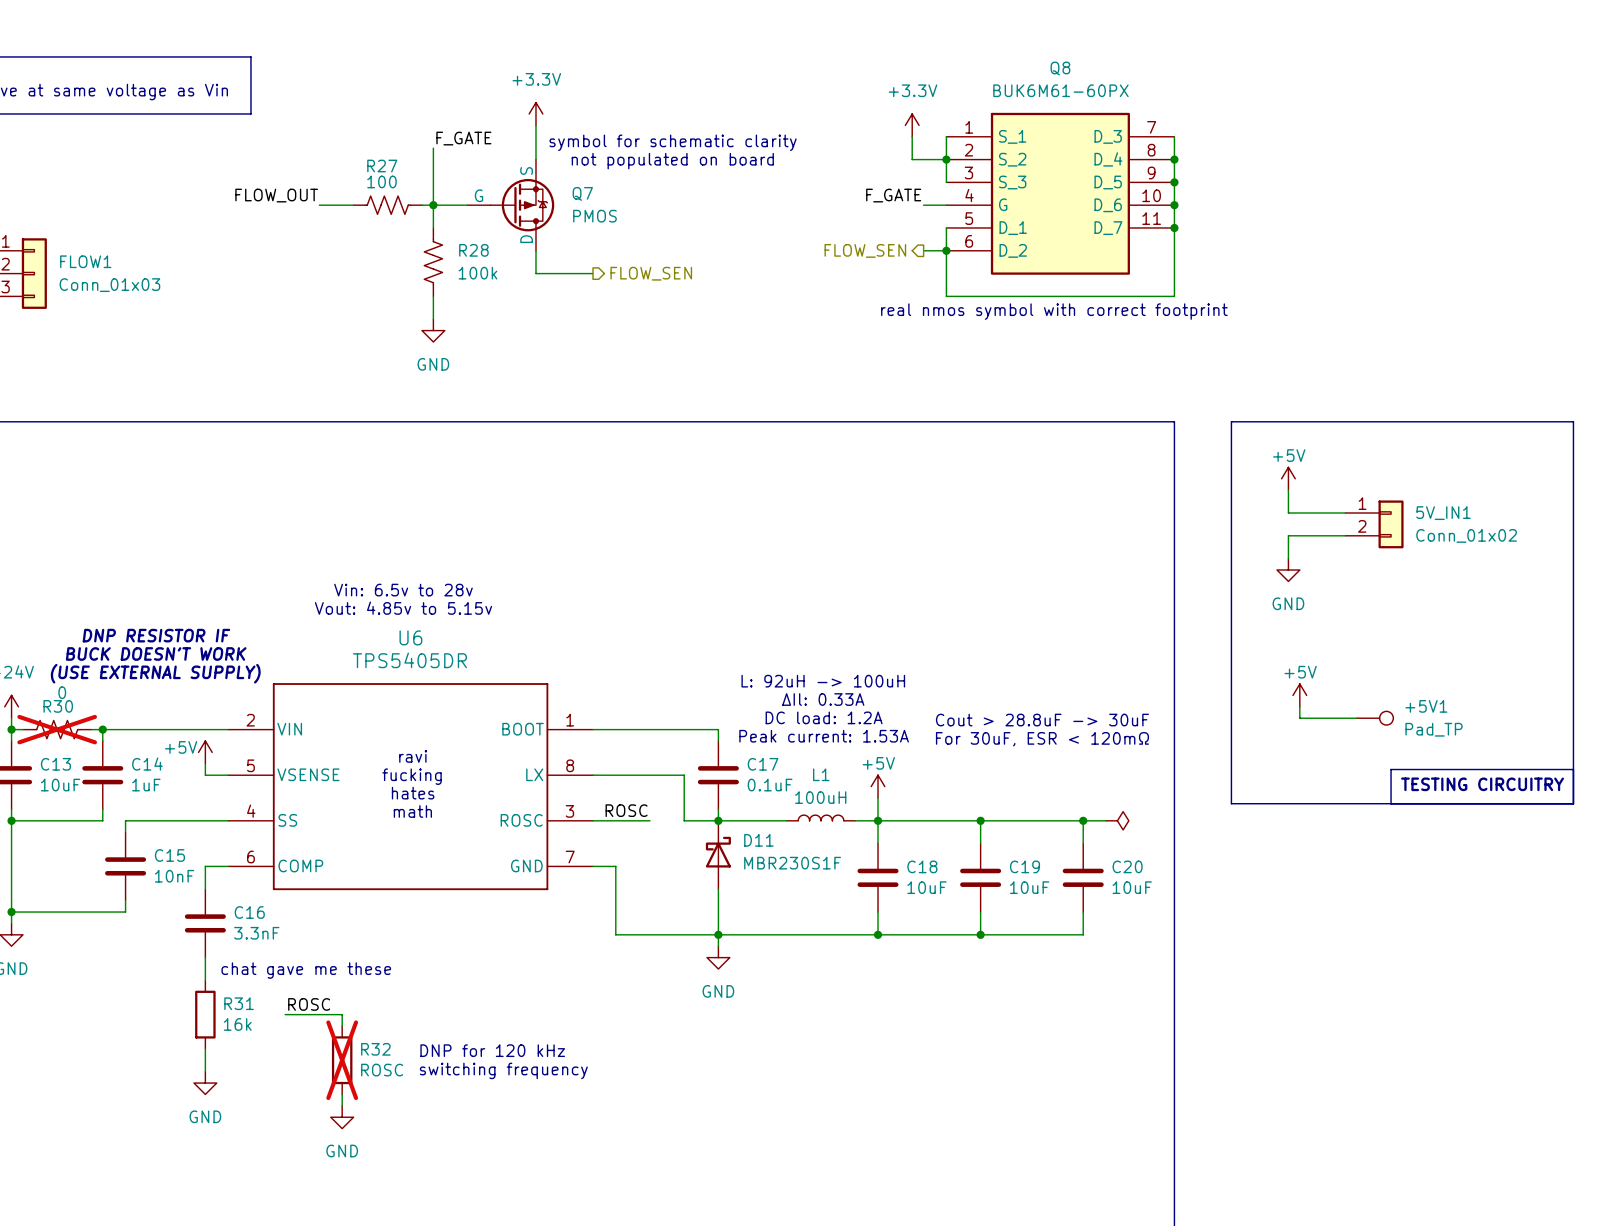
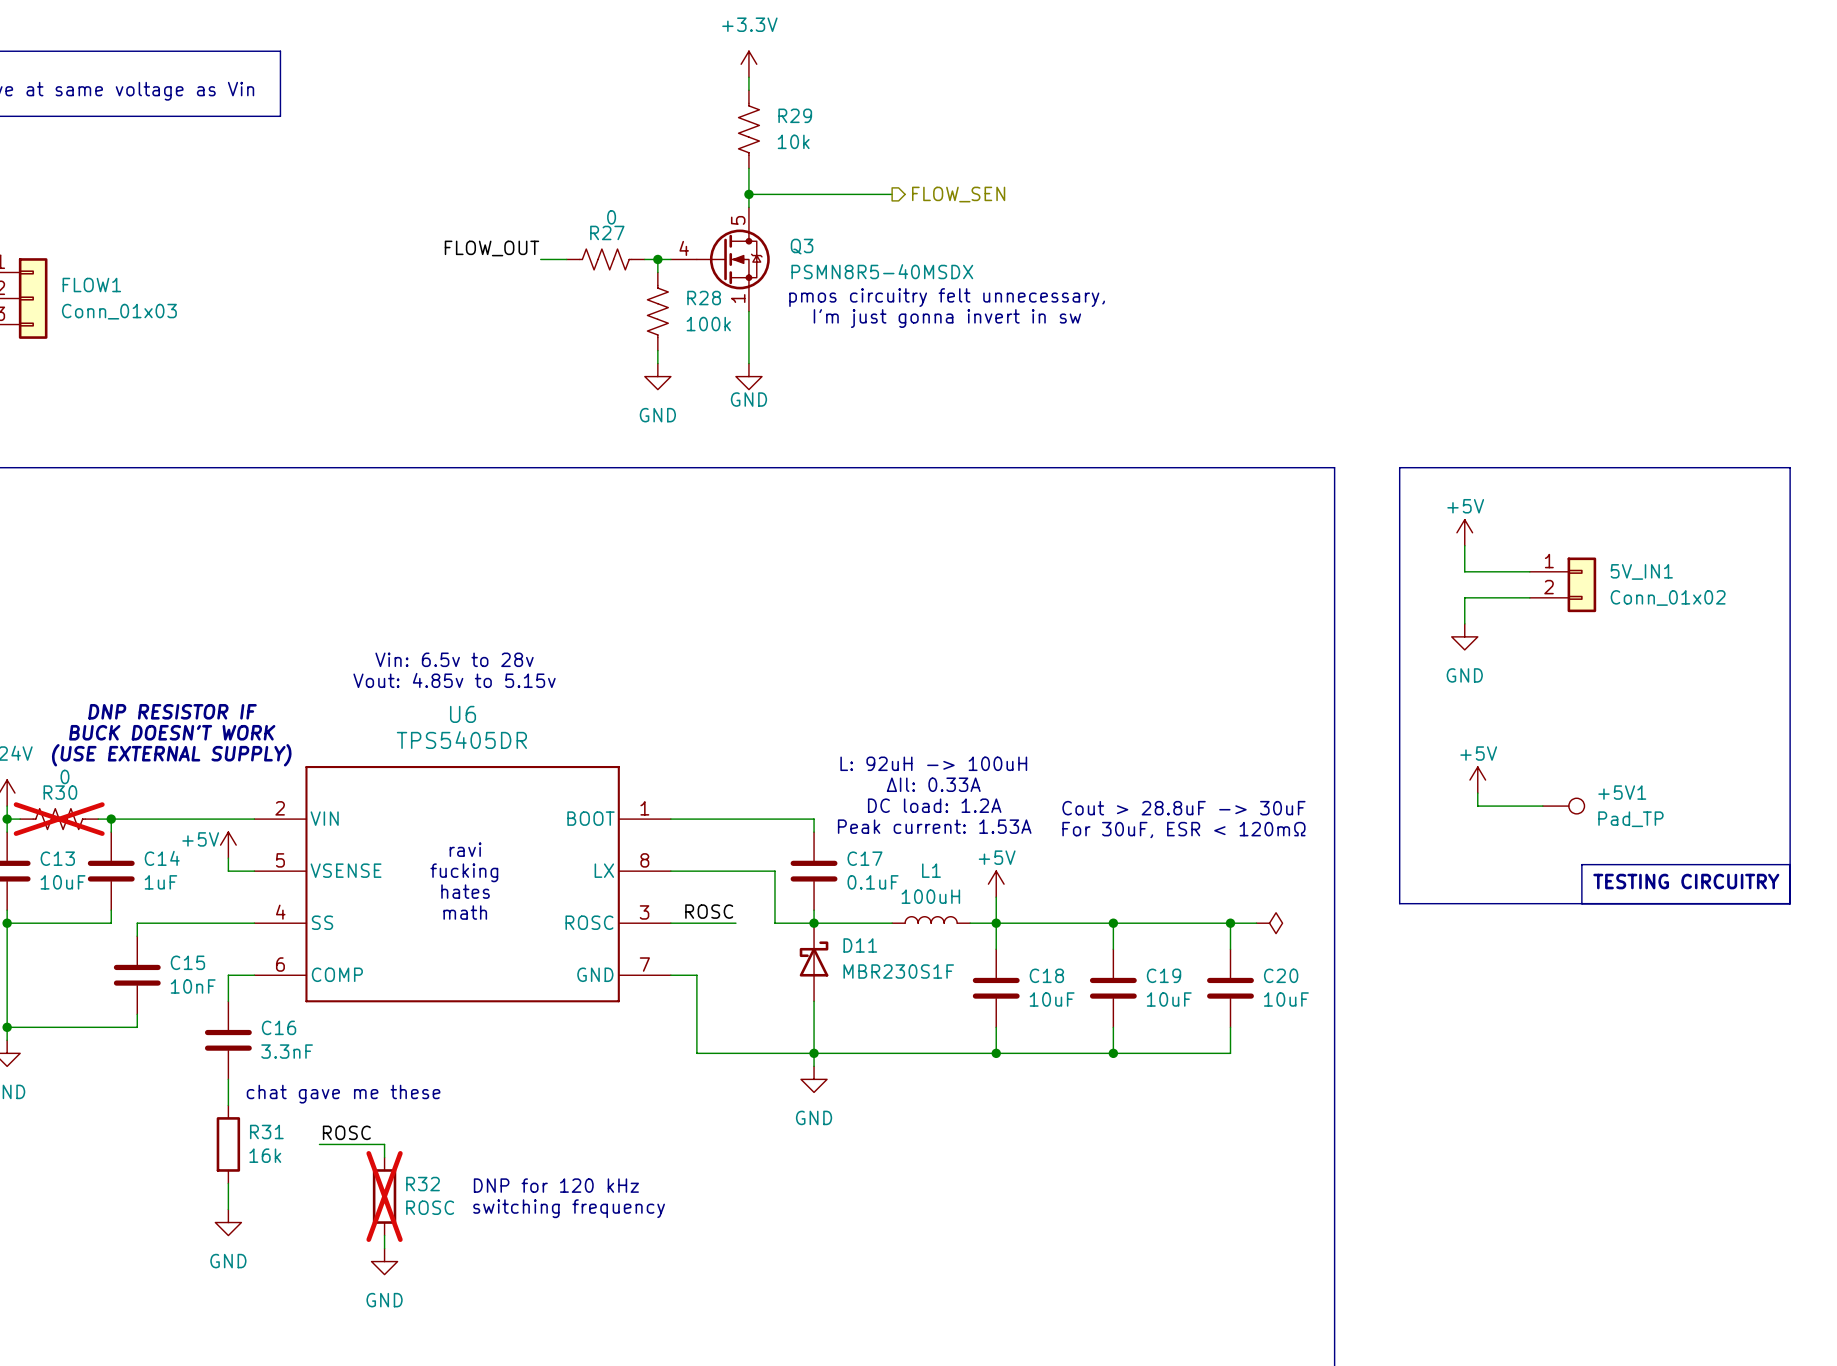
power symbol: none -> +3.3V (748, 64)
wire: none -> (748, 77) (748, 90)
power symbol: +3.3V (535, 113) -> none
wire: (535, 125) (535, 159) -> (748, 168) (748, 207)
R29: none -> 10k (748, 129)
power symbol: +3.3V (912, 125) -> none
wire: (912, 136) (912, 159) (946, 159) -> none
wire: (946, 136) (946, 182) -> none
wire: (1174, 136) (1174, 296) (946, 296) (946, 227) -> none
label: F_GATE (463, 138) -> none
text: symbol for schematic clarity (673, 142) -> none
wire: (433, 148) (433, 227) -> none
junction: (946, 159) -> none
junction: (1174, 159) -> none
text: not populated on board (672, 161) -> none
R27 name position: R27 (382, 165) -> R27 (607, 232)
R27 value: 100 (381, 181) -> 0 (611, 217)
wire: none -> (748, 194) (892, 194)
junction: none -> (748, 194)
hierarchical label: none -> FLOW_SEN (958, 194)
junction: (1174, 182) -> none
Q8: BUK6M61-60PX (1060, 193) -> none
label position: FLOW_OUT (276, 195) -> FLOW_OUT (491, 248)
label: F_GATE (893, 195) -> none
wire: (319, 205) (353, 205) -> none
R27 position: (387, 205) -> (605, 259)
wire: (421, 205) (467, 205) -> none
junction: (433, 205) -> none
Q7: PMOS (510, 205) -> none
wire: (923, 205) (946, 205) -> none
junction: (1174, 205) -> none
junction: (1174, 227) -> none
wire: none -> (540, 259) (566, 259)
wire: none -> (644, 259) (670, 259)
wire: none -> (657, 259) (657, 272)
junction: none -> (657, 259)
Q3: none -> PSMN8R5-40MSDX (720, 259)
wire: (535, 250) (535, 273) (592, 273) -> none
hierarchical label: FLOW_SEN (865, 250) -> none
wire: (923, 250) (946, 250) -> none
junction: (946, 250) -> none
R28 position: (433, 262) -> (657, 311)
text: none -> pmos circuitry felt unnecessary, (947, 297)
hierarchical label: FLOW_SEN (651, 273) -> none
wire: none -> (748, 311) (748, 363)
text: none -> I'm just gonna invert in sw (947, 318)
wire: (433, 296) (433, 319) -> none
text: real nmos symbol with correct footprint (1054, 311) -> none
wire: none -> (657, 350) (657, 363)
power symbol: GND (433, 330) -> none
power symbol: none -> GND (657, 376)
power symbol: none -> GND (748, 376)

